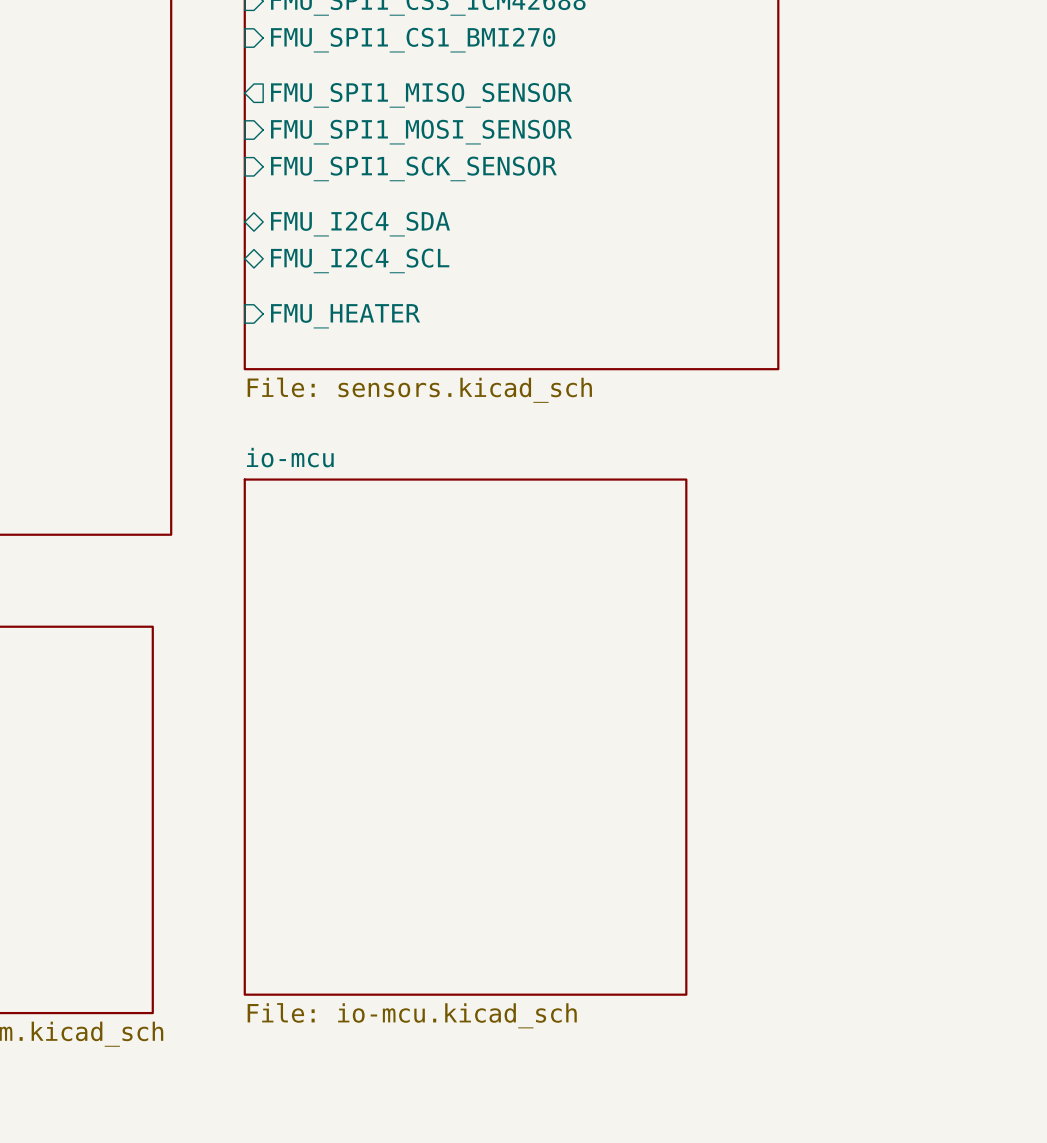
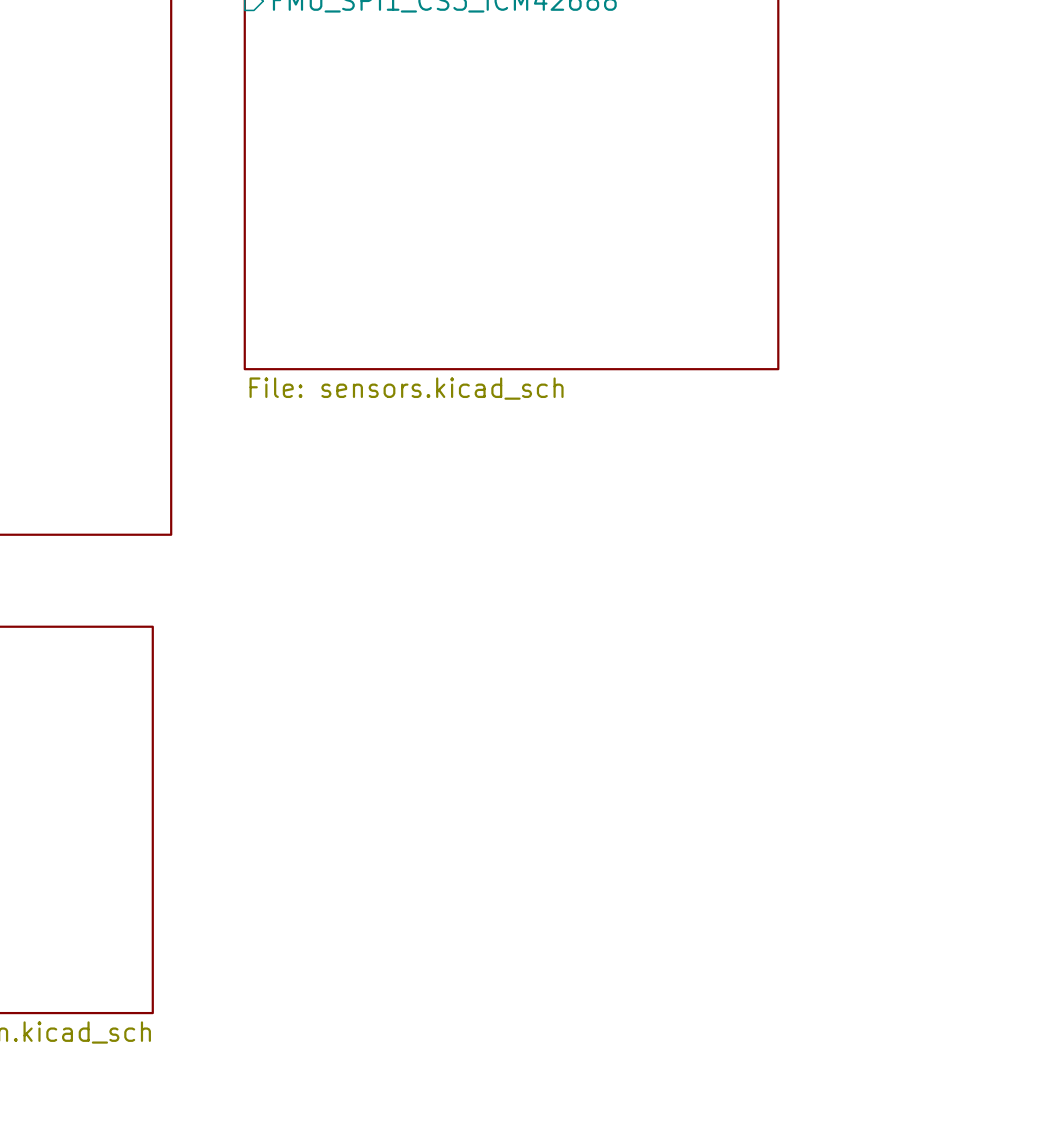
sheet pin: FMU_SPI1_CS1_BMI270 (413, 40) -> none
sheet pin: FMU_SPI1_MISO_SENSOR (421, 95) -> none
sheet pin: FMU_SPI1_MOSI_SENSOR (421, 132) -> none
sheet pin: FMU_SPI1_SCK_SENSOR (413, 168) -> none
sheet pin: FMU_I2C4_SDA (360, 224) -> none
sheet pin: FMU_I2C4_SCL (360, 260) -> none
sheet pin: FMU_HEATER (345, 316) -> none
sheet io-mcu: File: io-mcu.kicad_sch (465, 737) -> none

